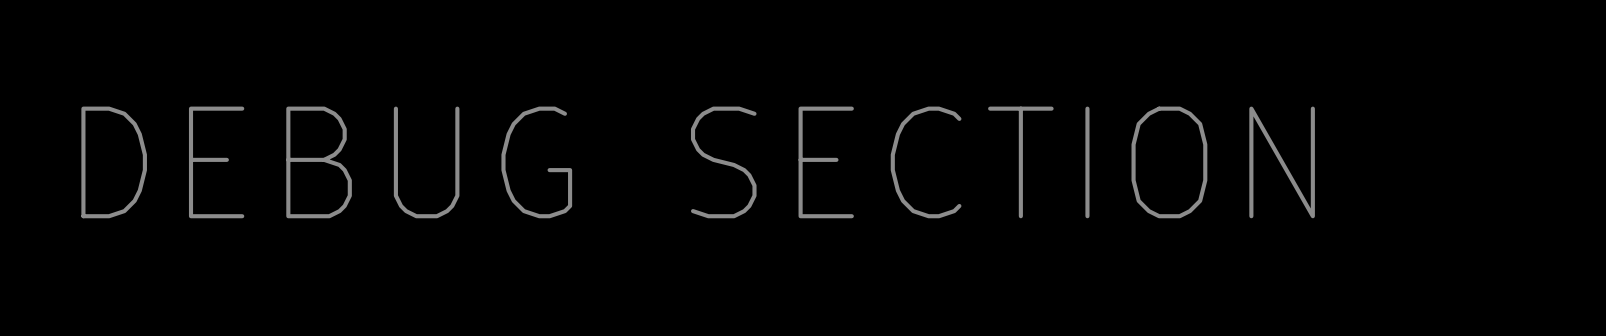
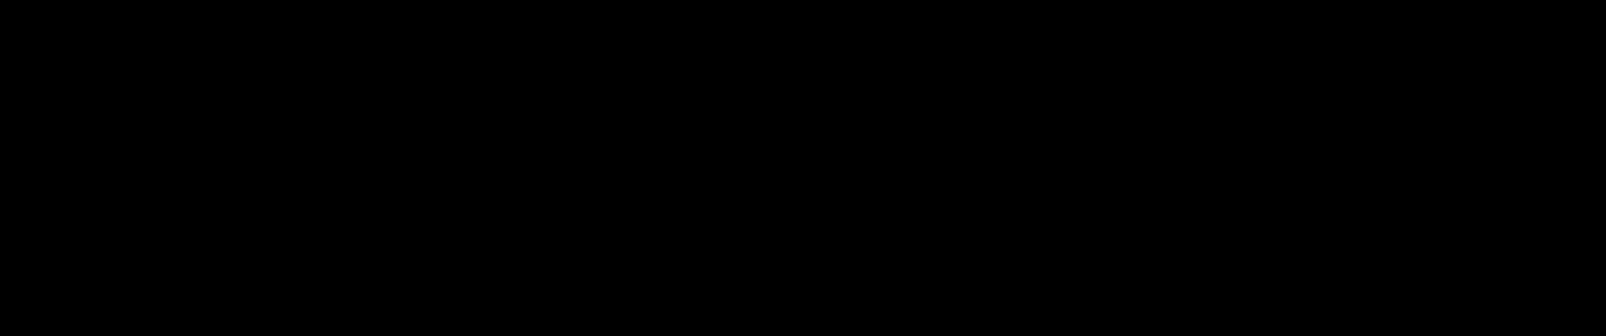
text: DEBUG SECTION (698, 162) -> none

